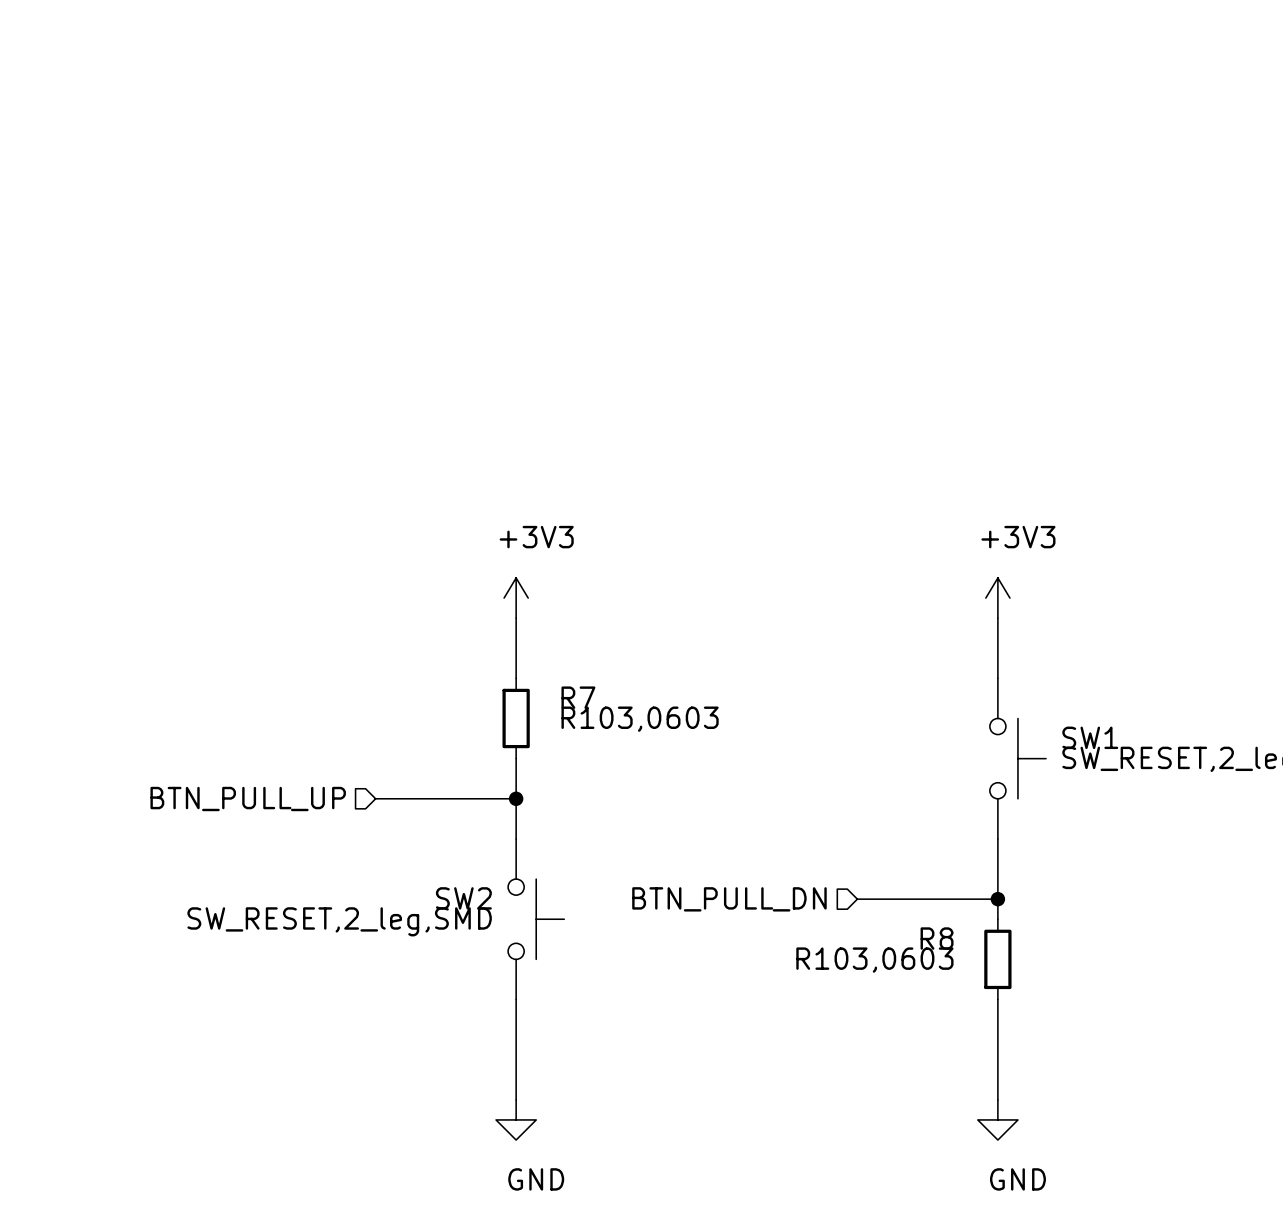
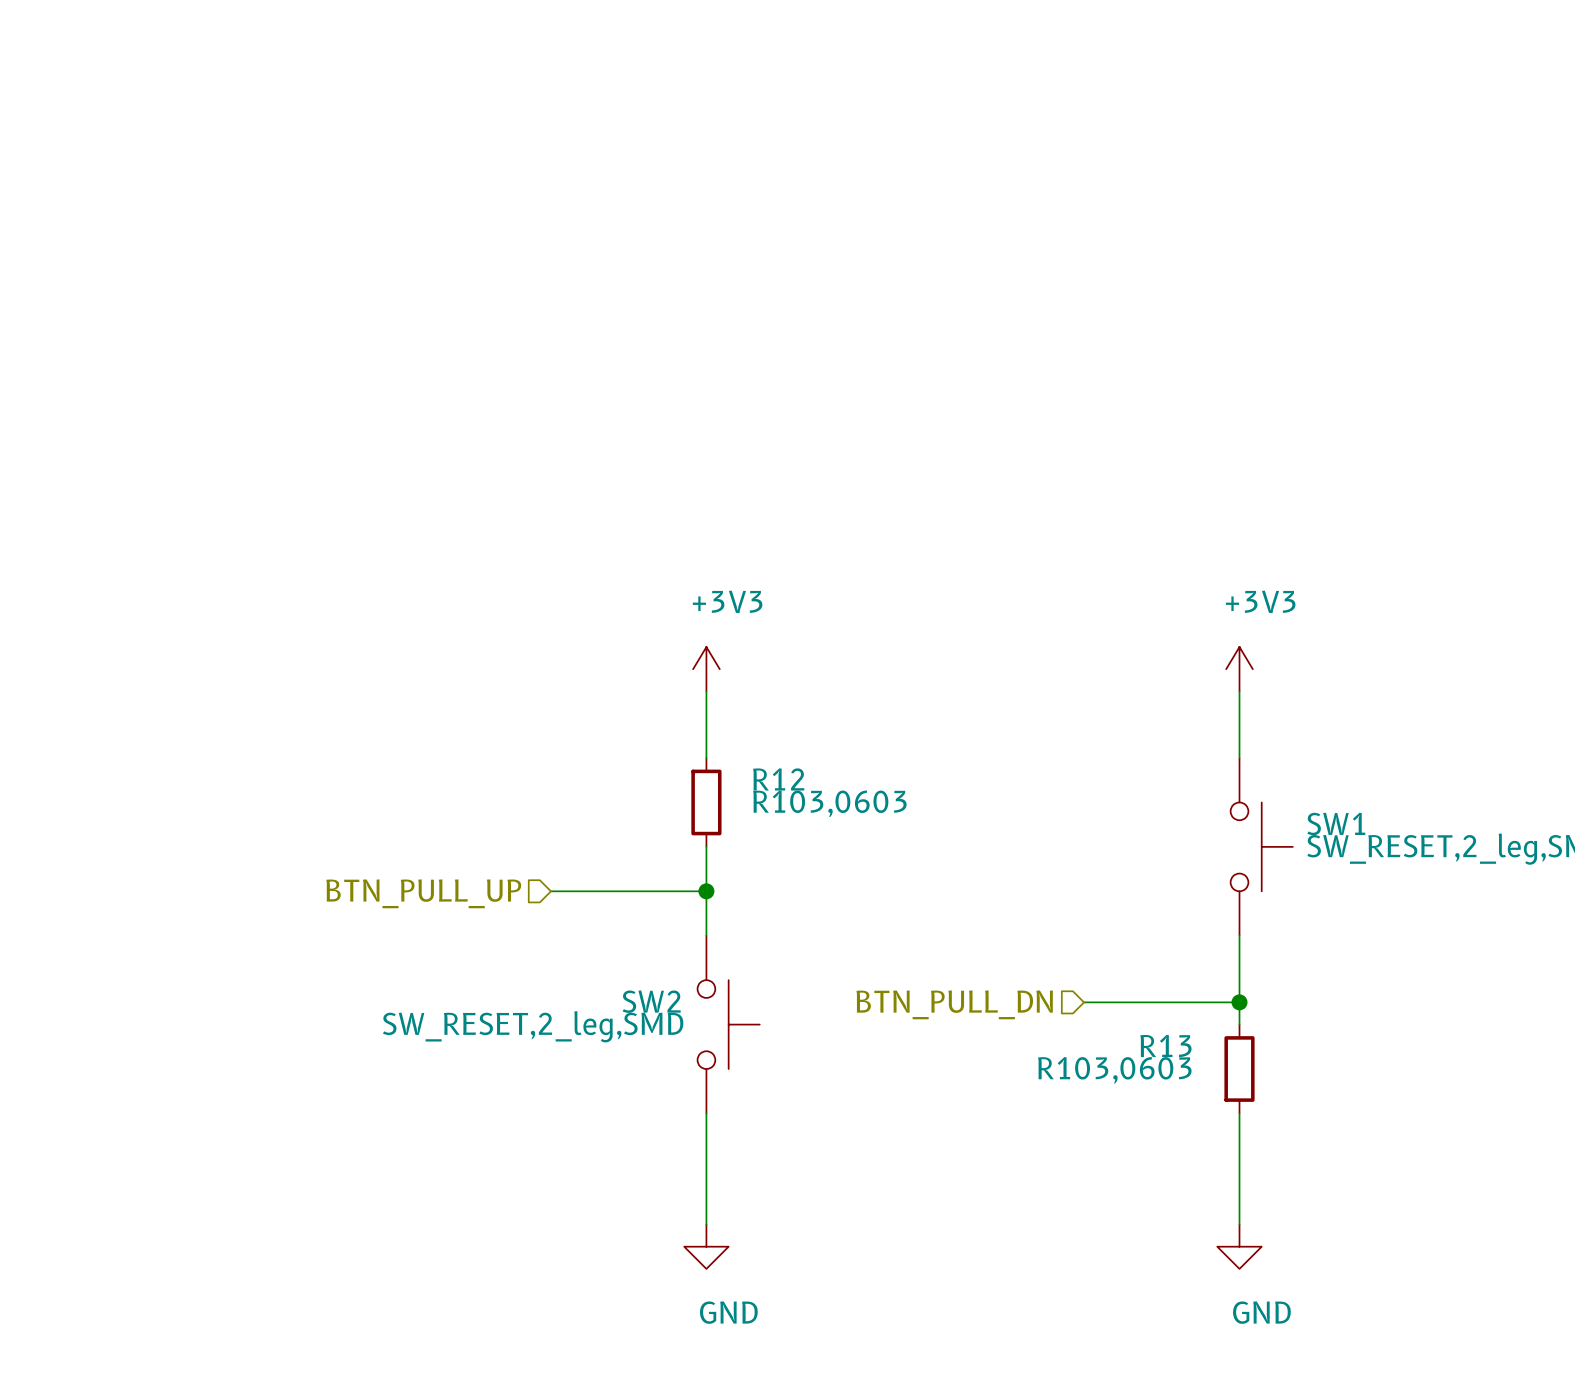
R7 name: R7 (578, 697) -> R12 (778, 779)
R8 name: R8 (937, 938) -> R13 (1165, 1045)

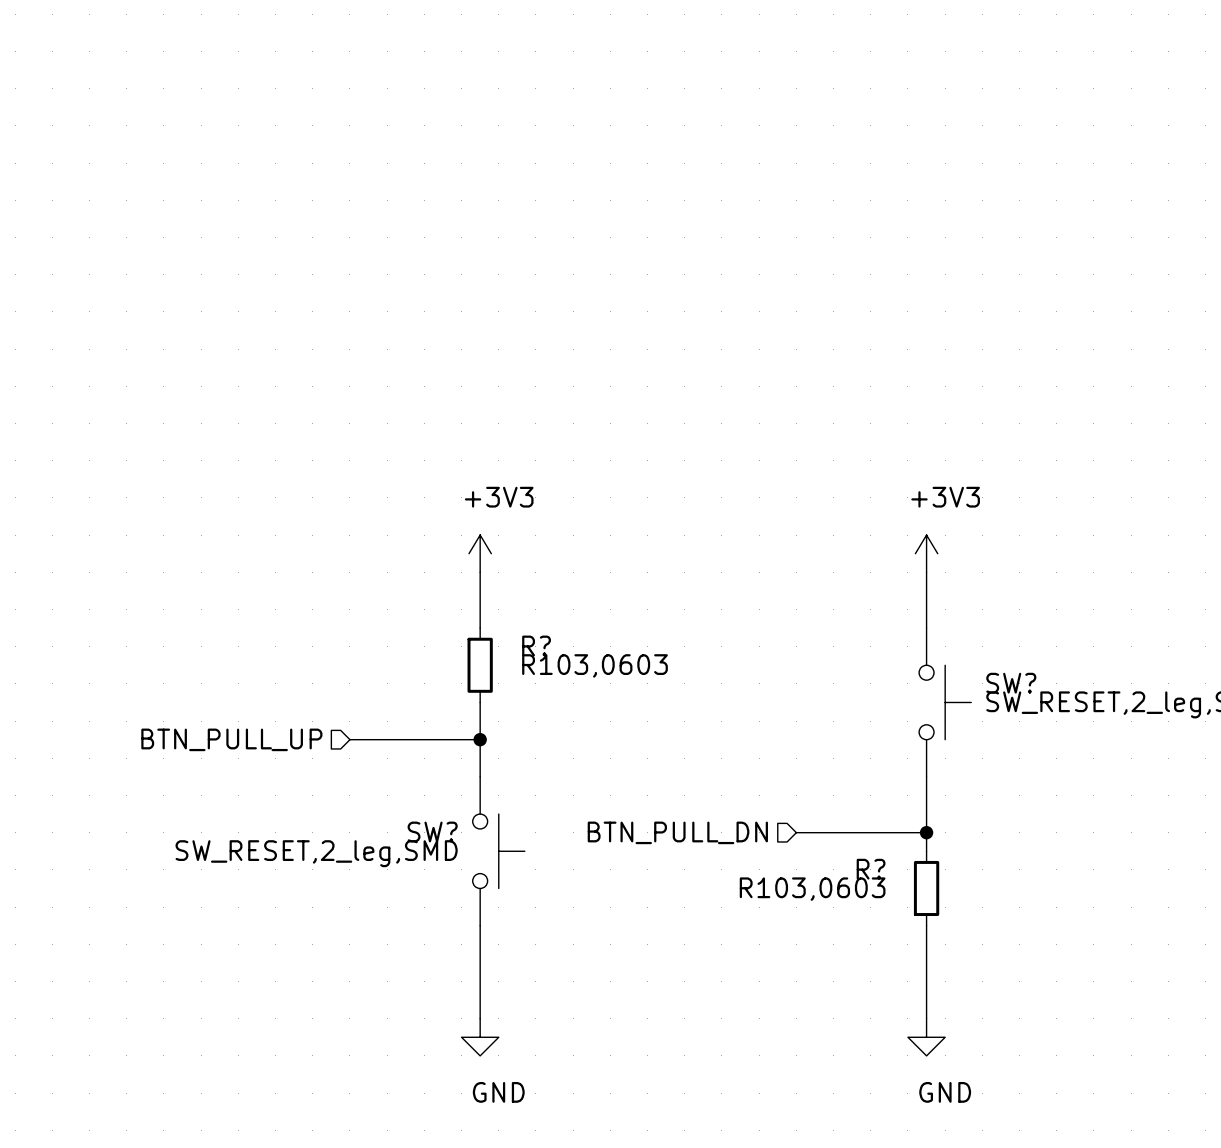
R12 name: R12 (778, 779) -> R? (536, 645)
SW1 name: SW1 (1336, 823) -> SW? (1011, 683)
SW2 name: SW2 (651, 1001) -> SW? (432, 831)
R13 name: R13 (1165, 1045) -> R? (871, 869)

